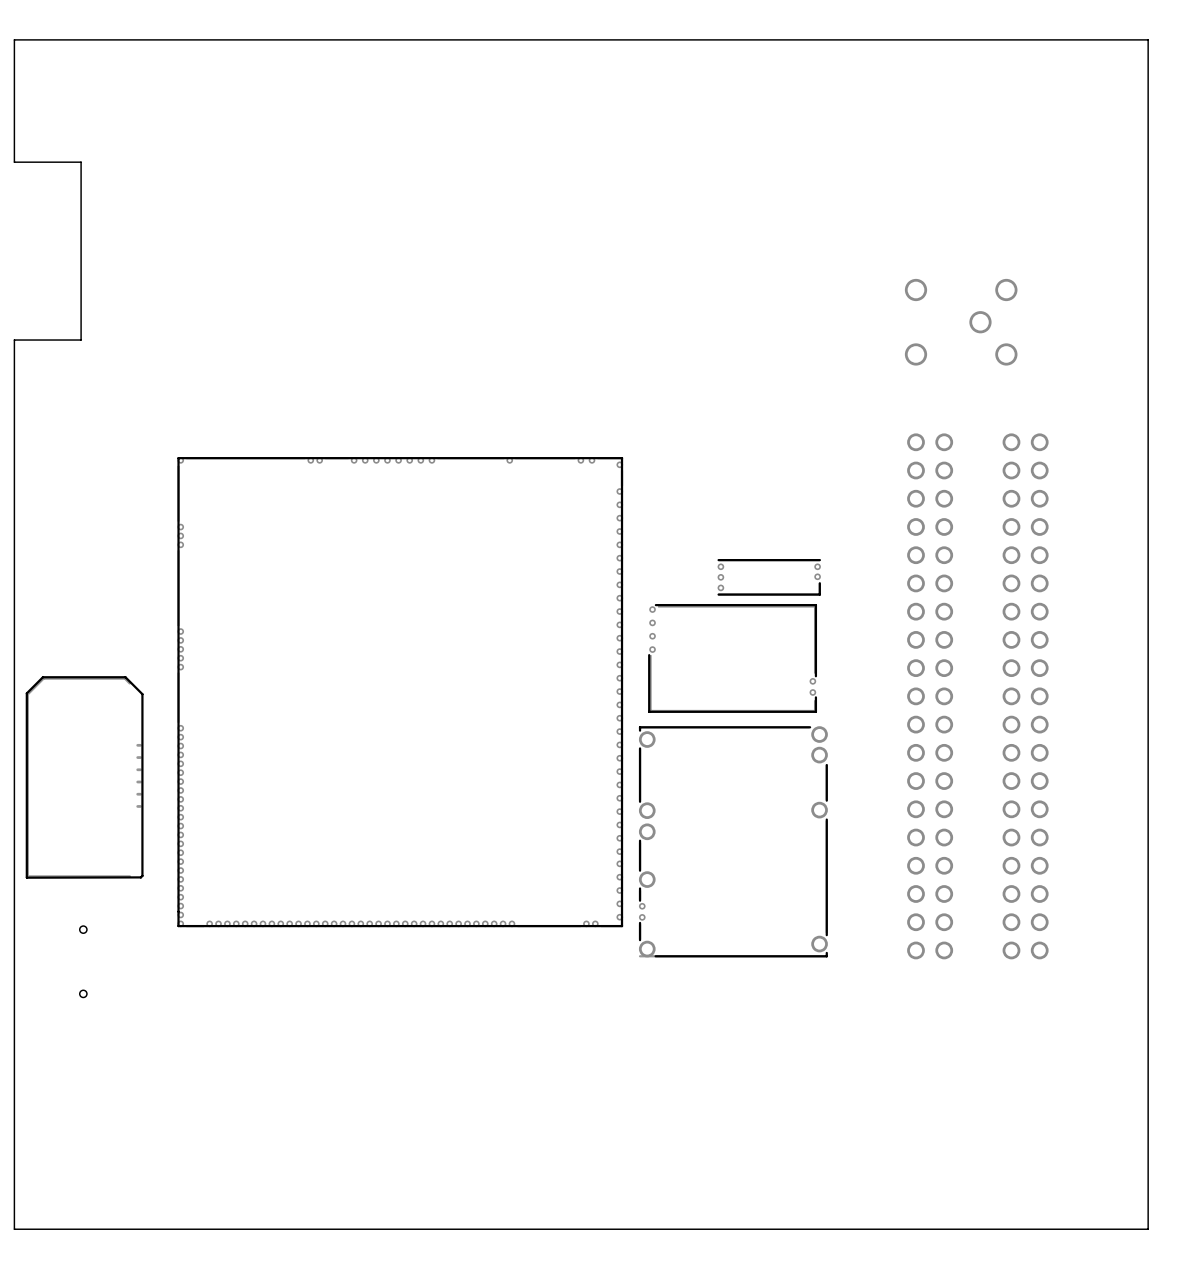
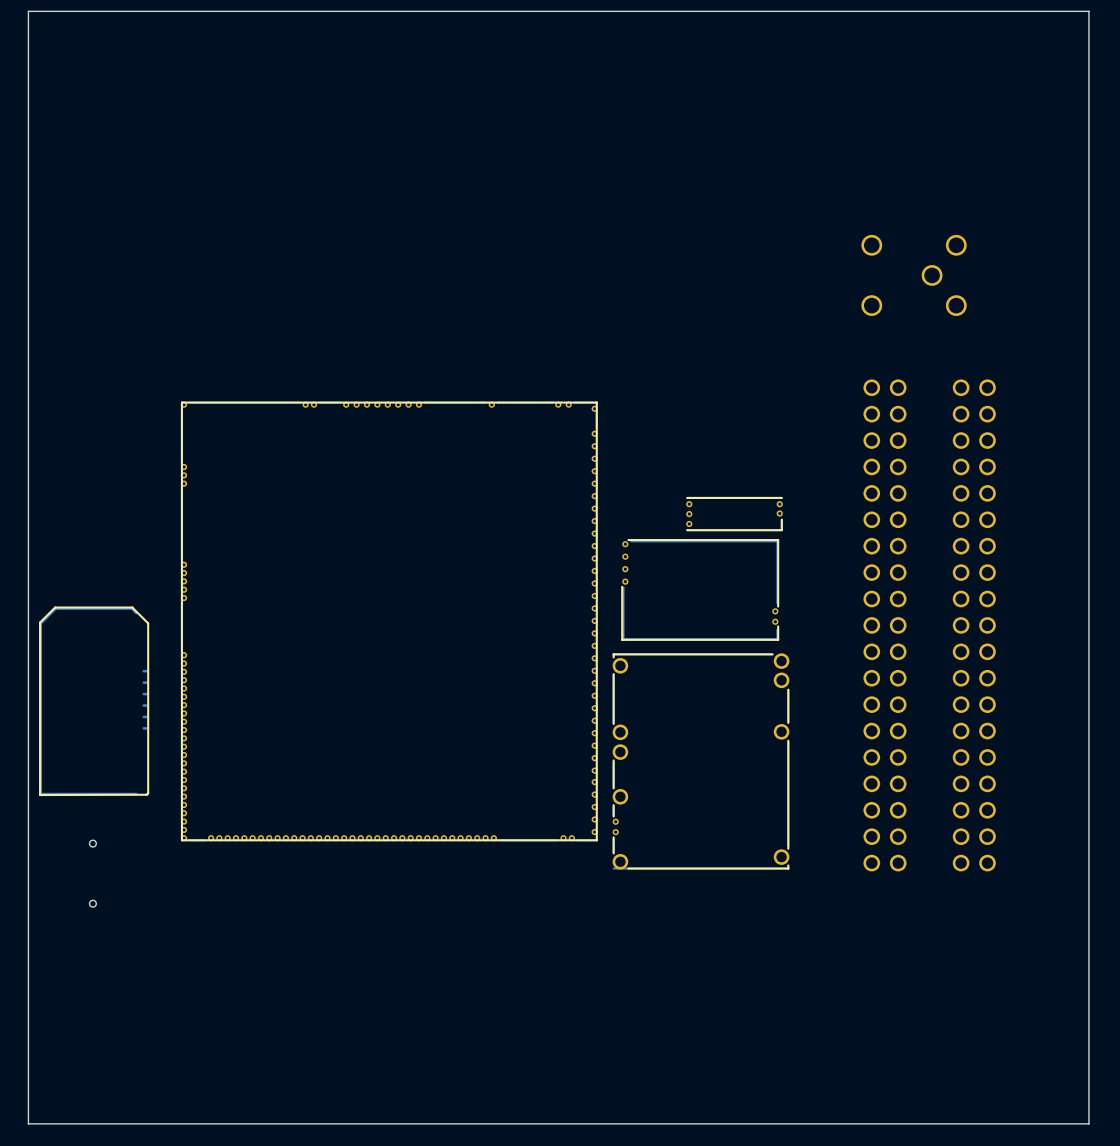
board edge: (14, 162) (81, 162) (81, 340) (14, 340) -> (28, 125) (28, 292)

